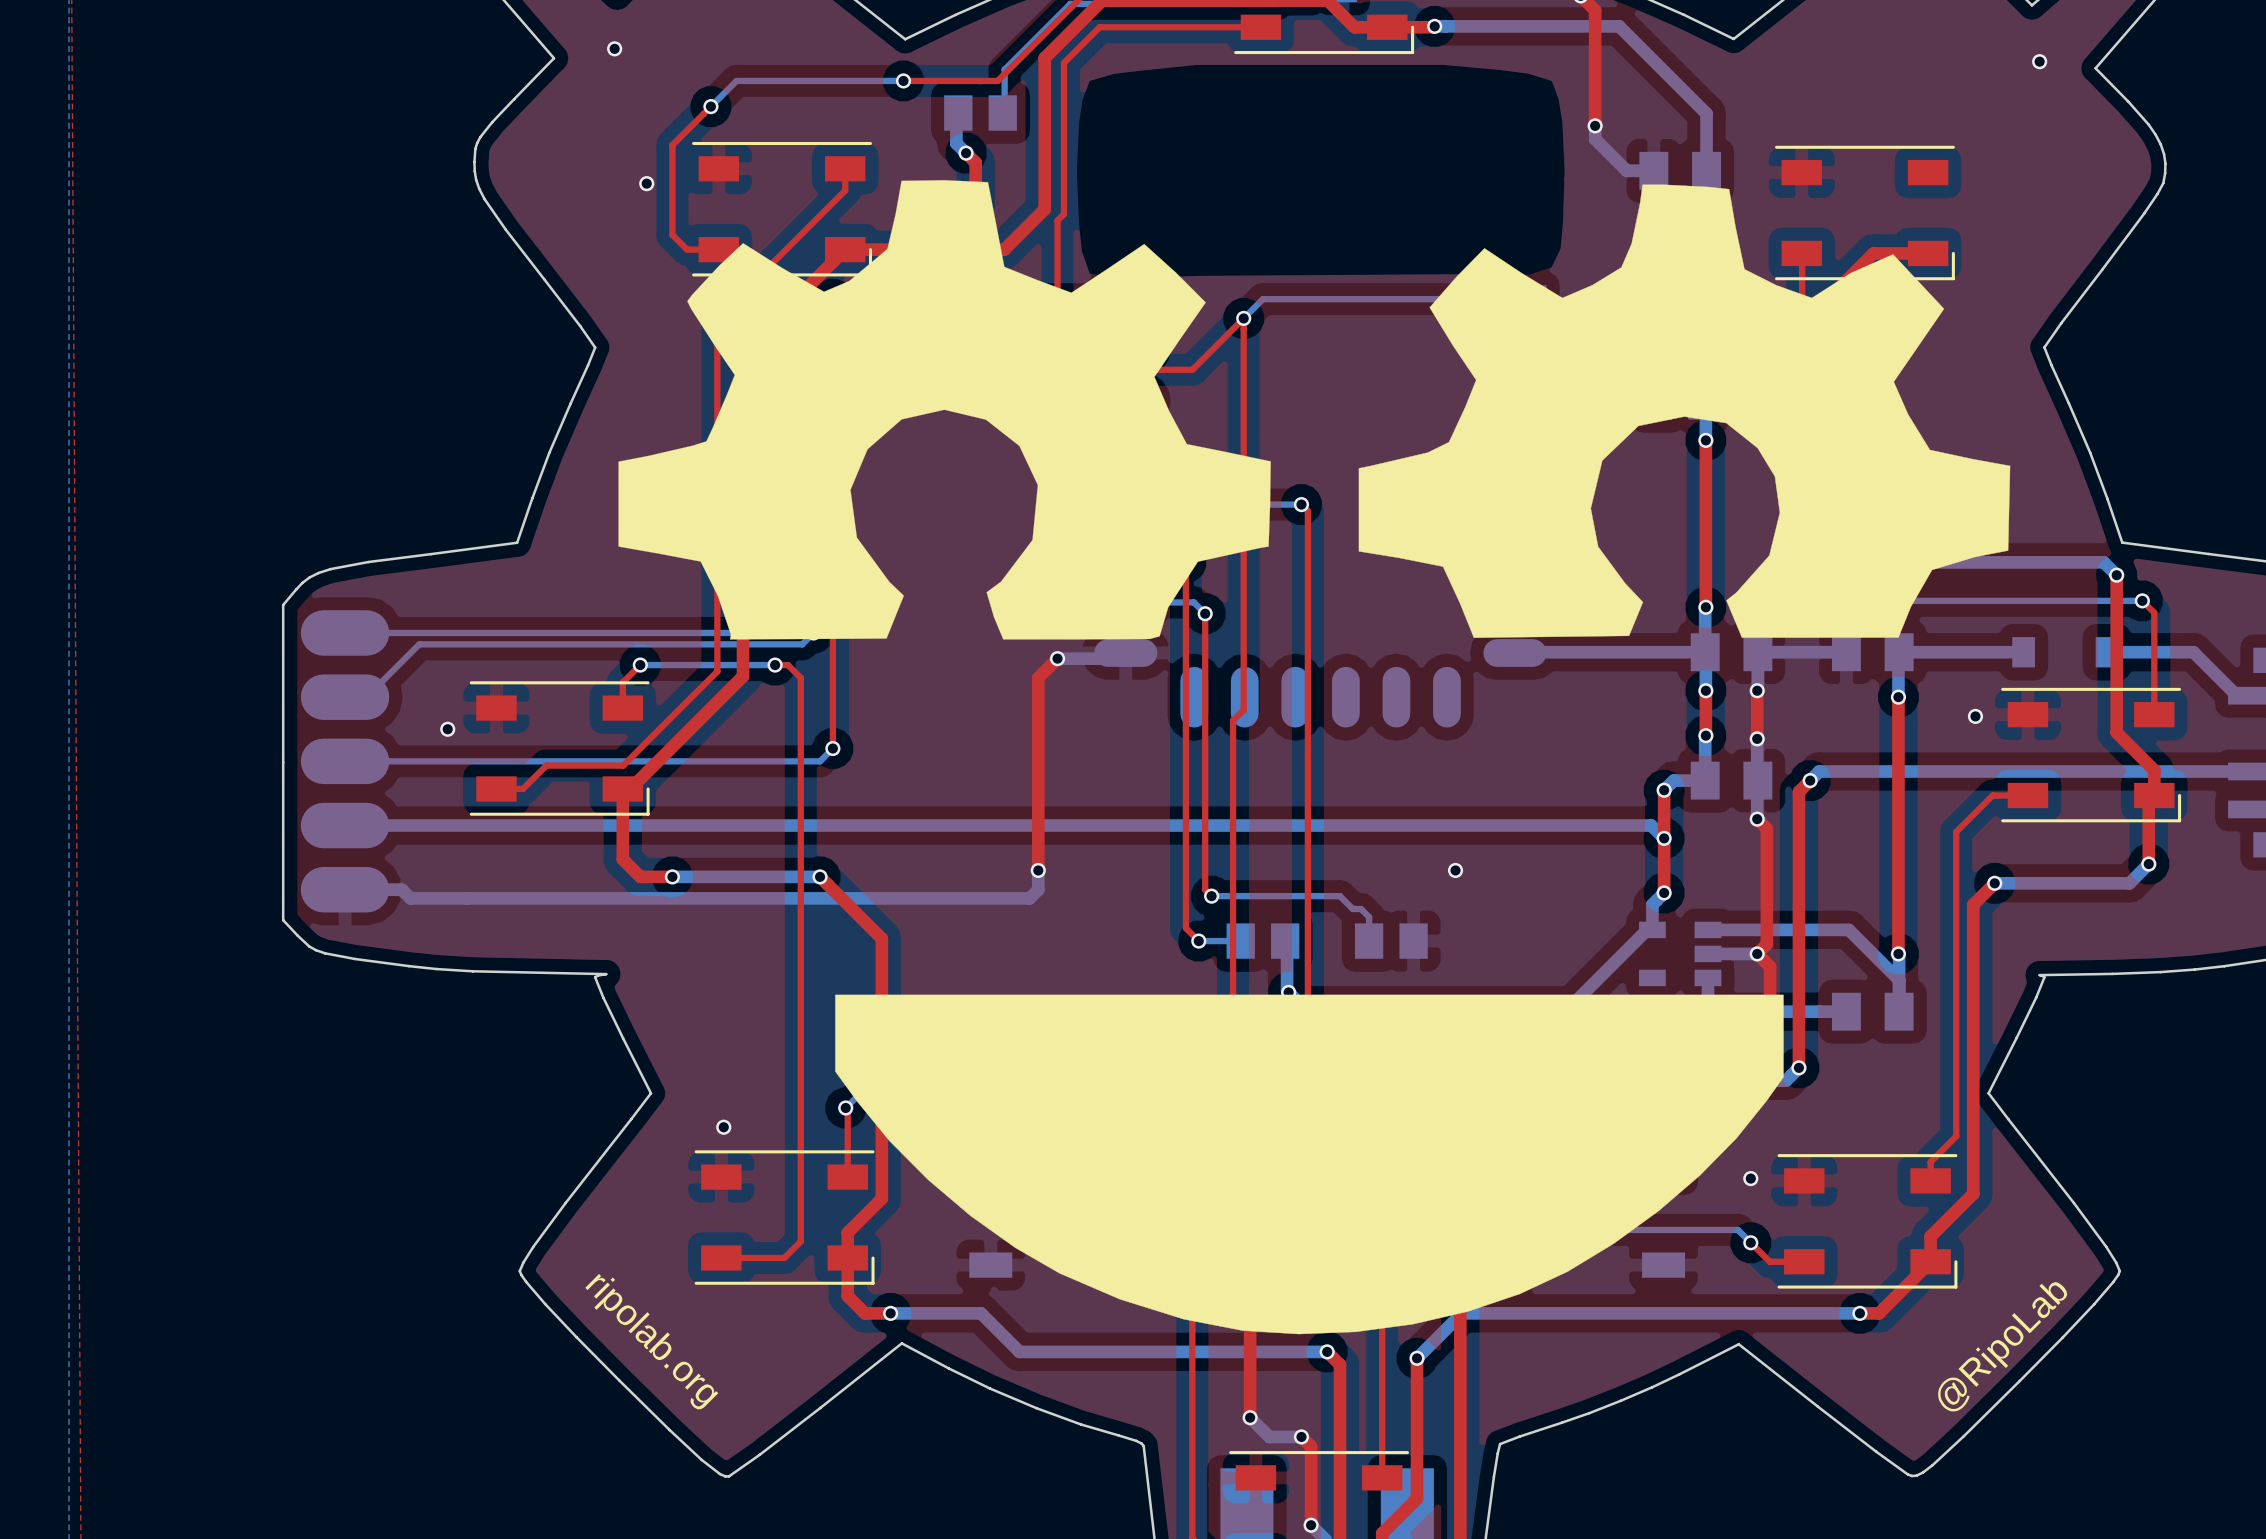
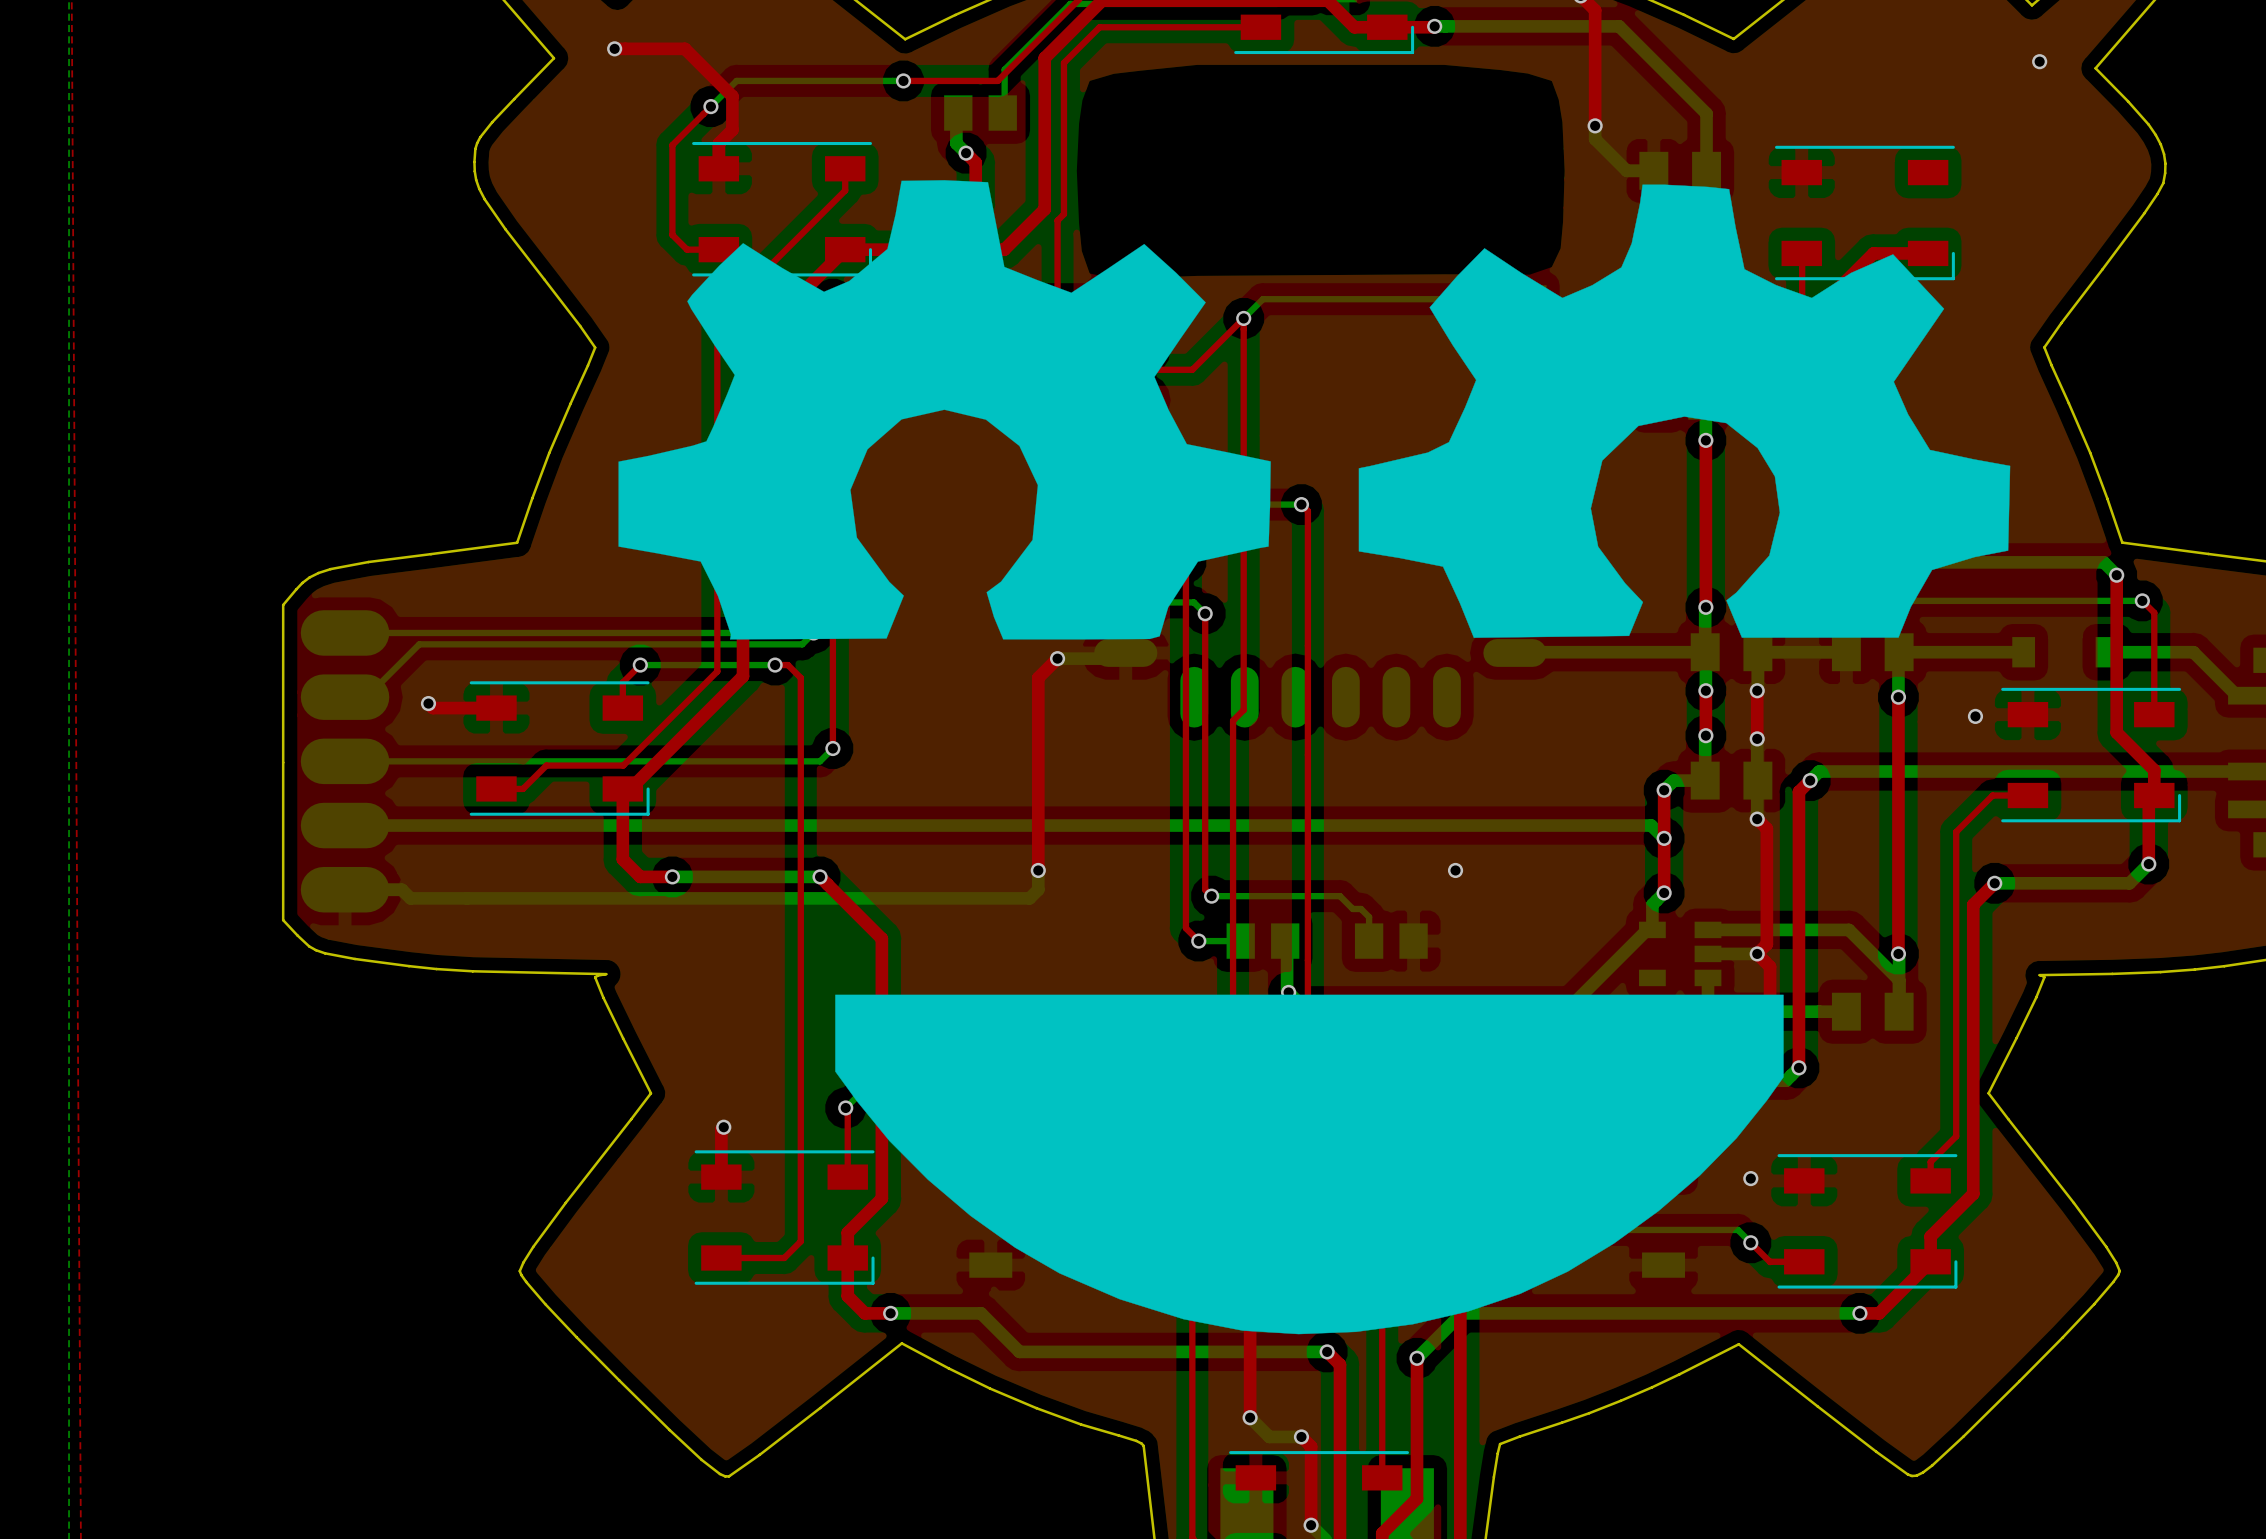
top track: none -> (614, 48) (684, 48) (732, 96) (732, 129) (718, 143) (718, 168)
via: (646, 183) -> none
top track: none -> (428, 703) (432, 708) (496, 708)
via position: (447, 729) -> (428, 703)
top track: none -> (723, 1127) (721, 1129) (721, 1177)
text: ripolab.org (651, 1343) -> none
text: @RipoLab (2003, 1346) -> none

